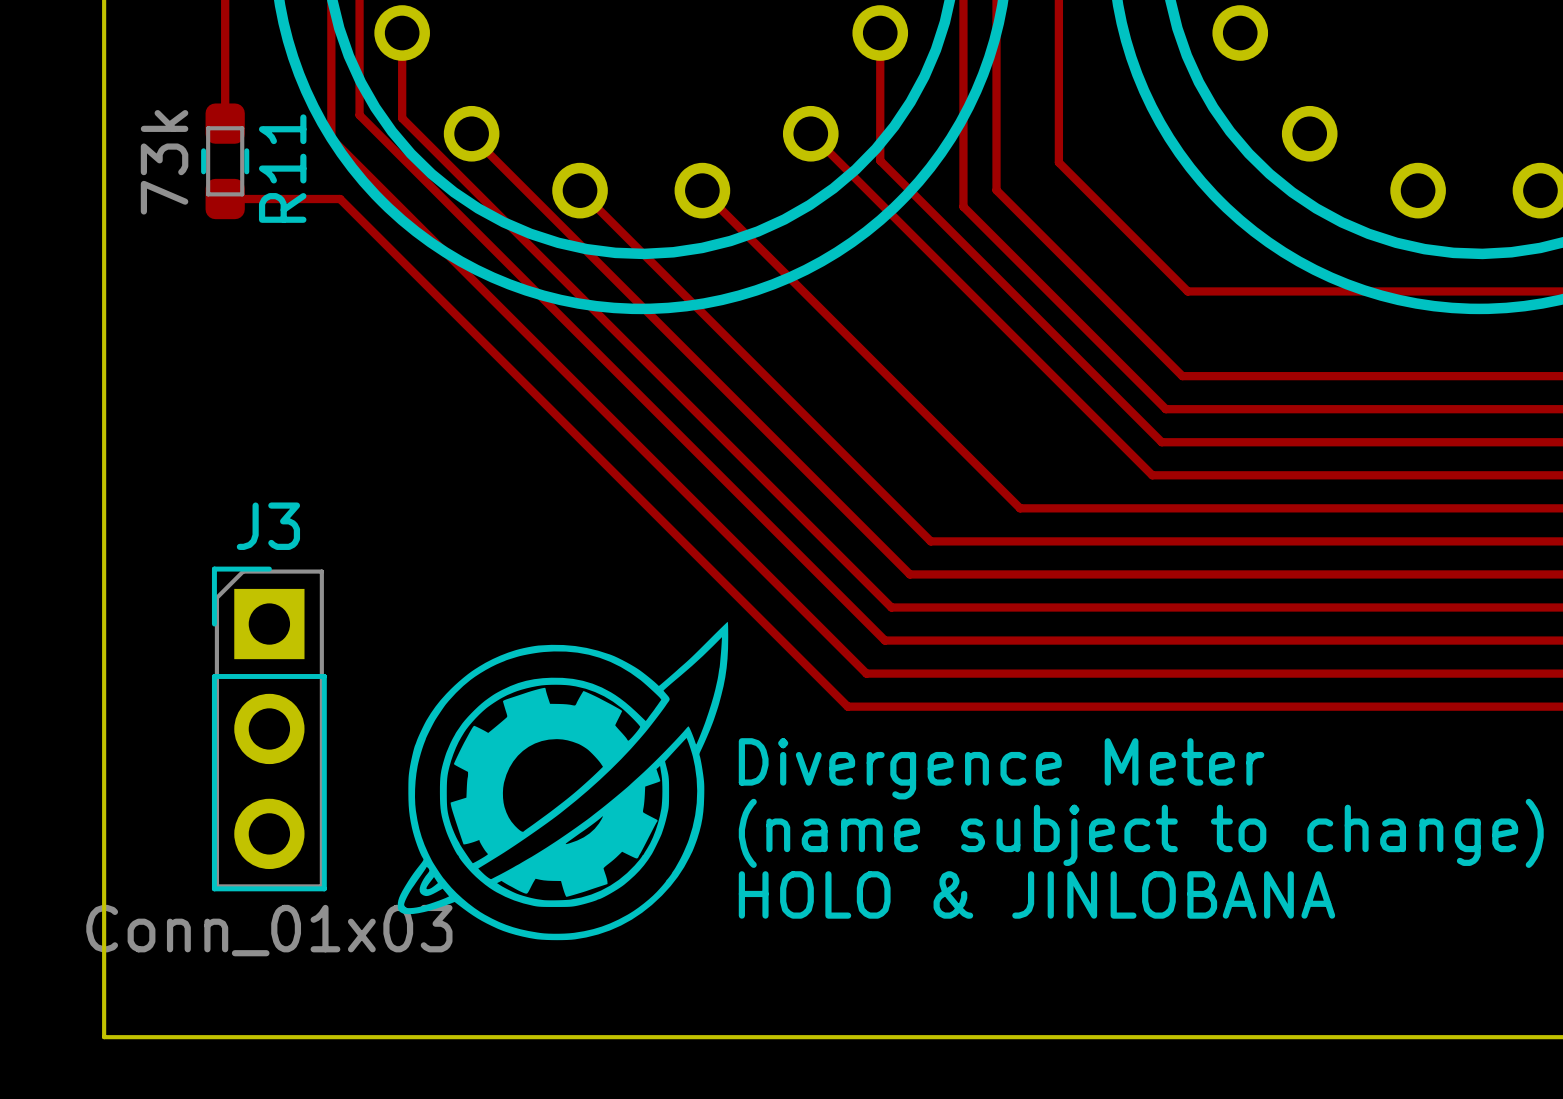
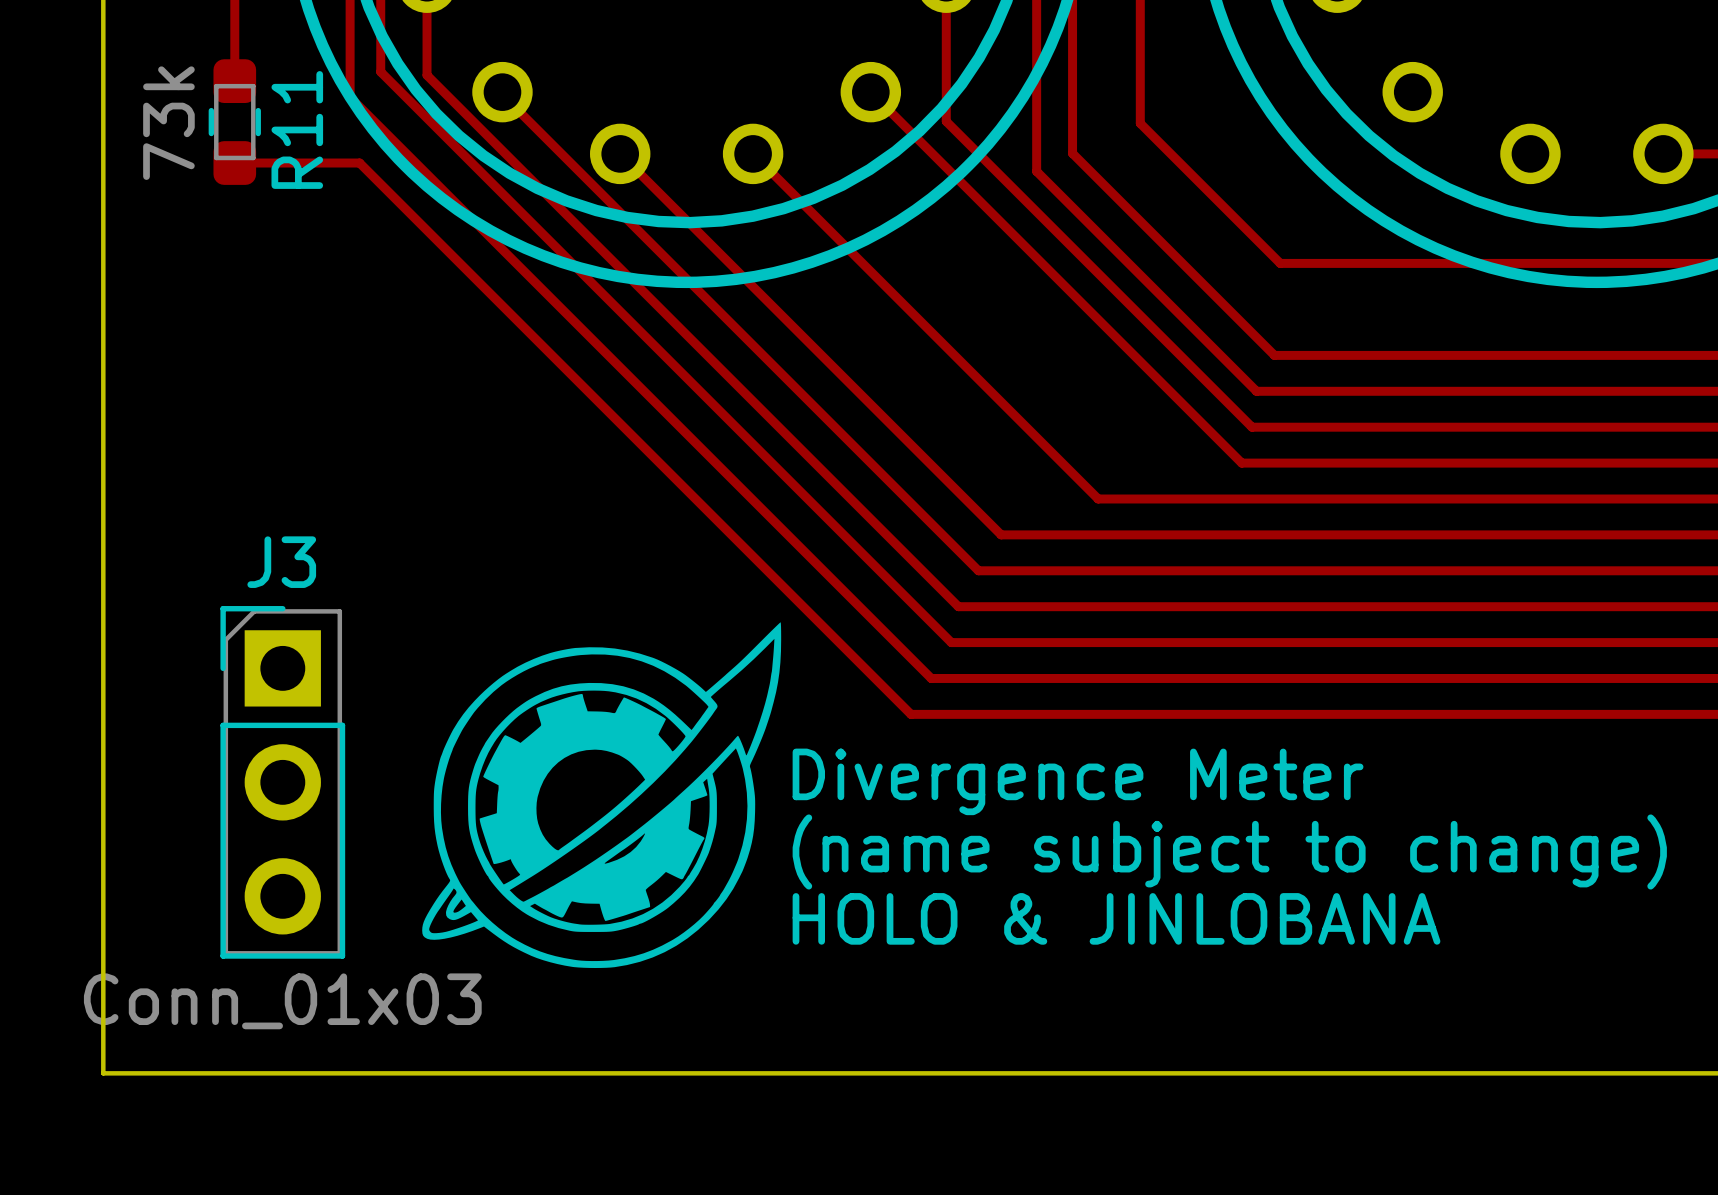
J3 position: (269, 728) -> (282, 782)

